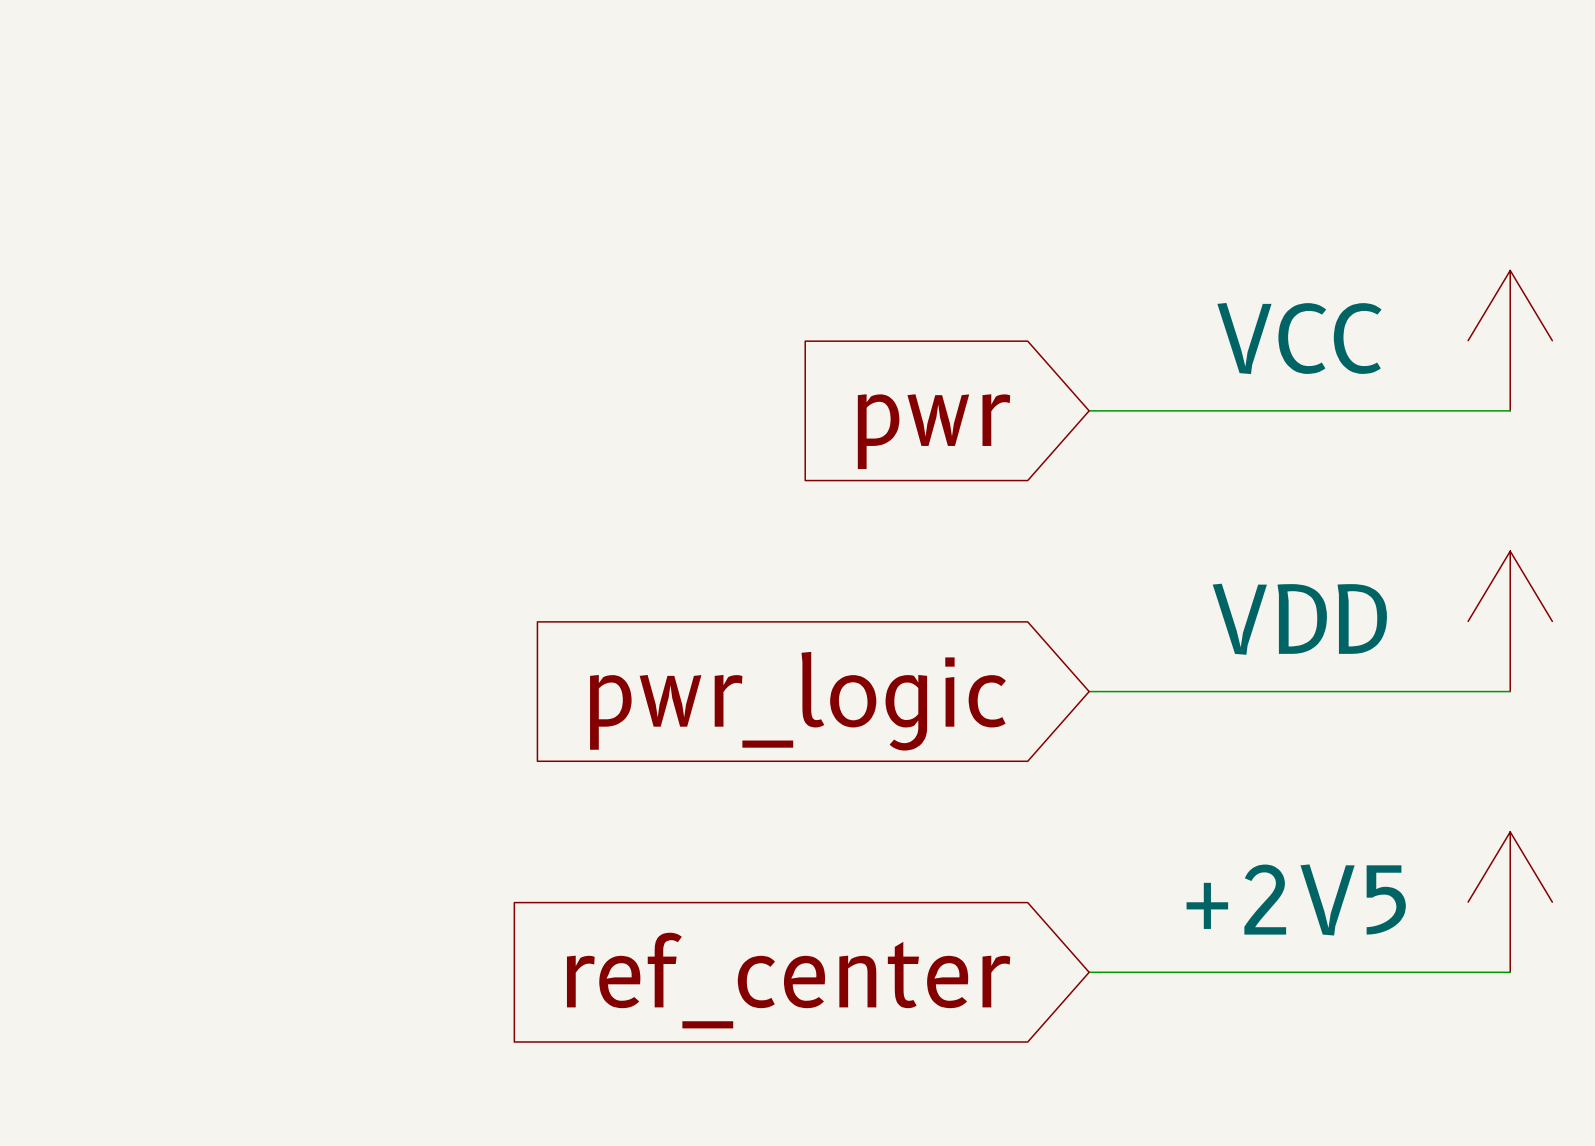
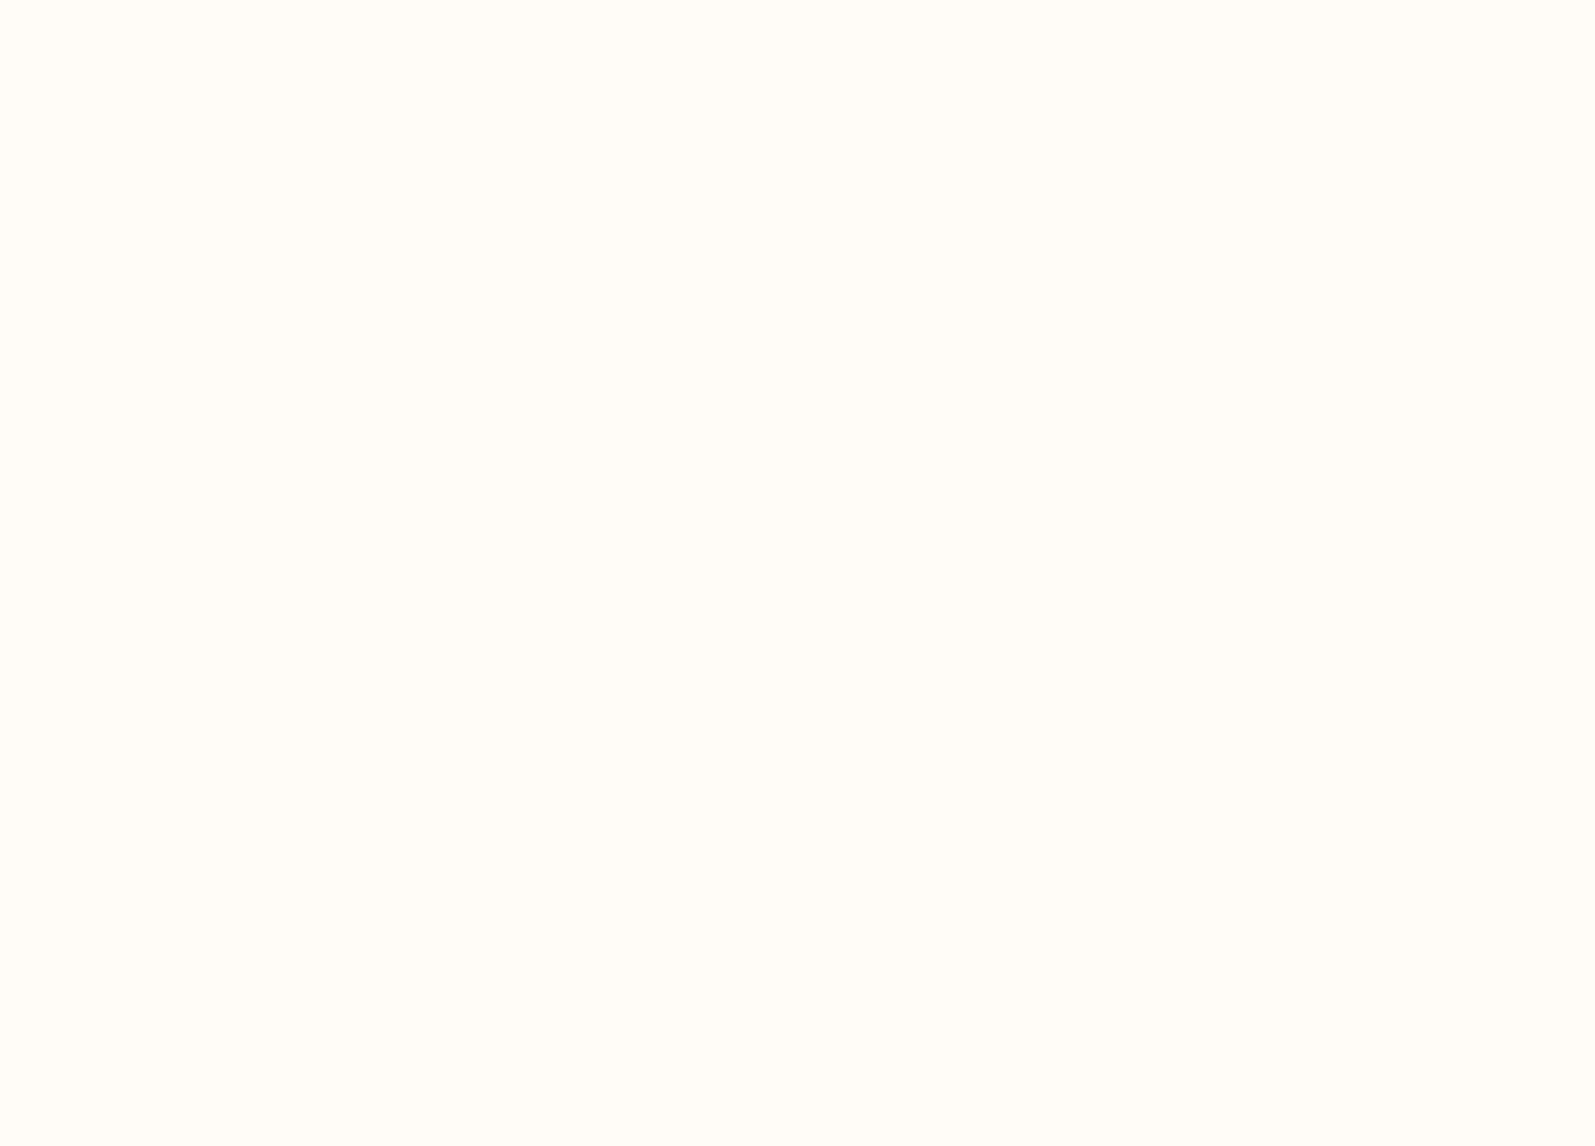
power symbol: VCC (1510, 340) -> none
wire: (1089, 410) (1510, 410) -> none
global label: pwr (934, 431) -> none
power symbol: VDD (1510, 621) -> none
wire: (1089, 691) (1510, 691) -> none
global label: pwr_logic (797, 701) -> none
power symbol: +2V5 (1510, 902) -> none
wire: (1089, 972) (1510, 972) -> none
global label: ref_center (788, 980) -> none

